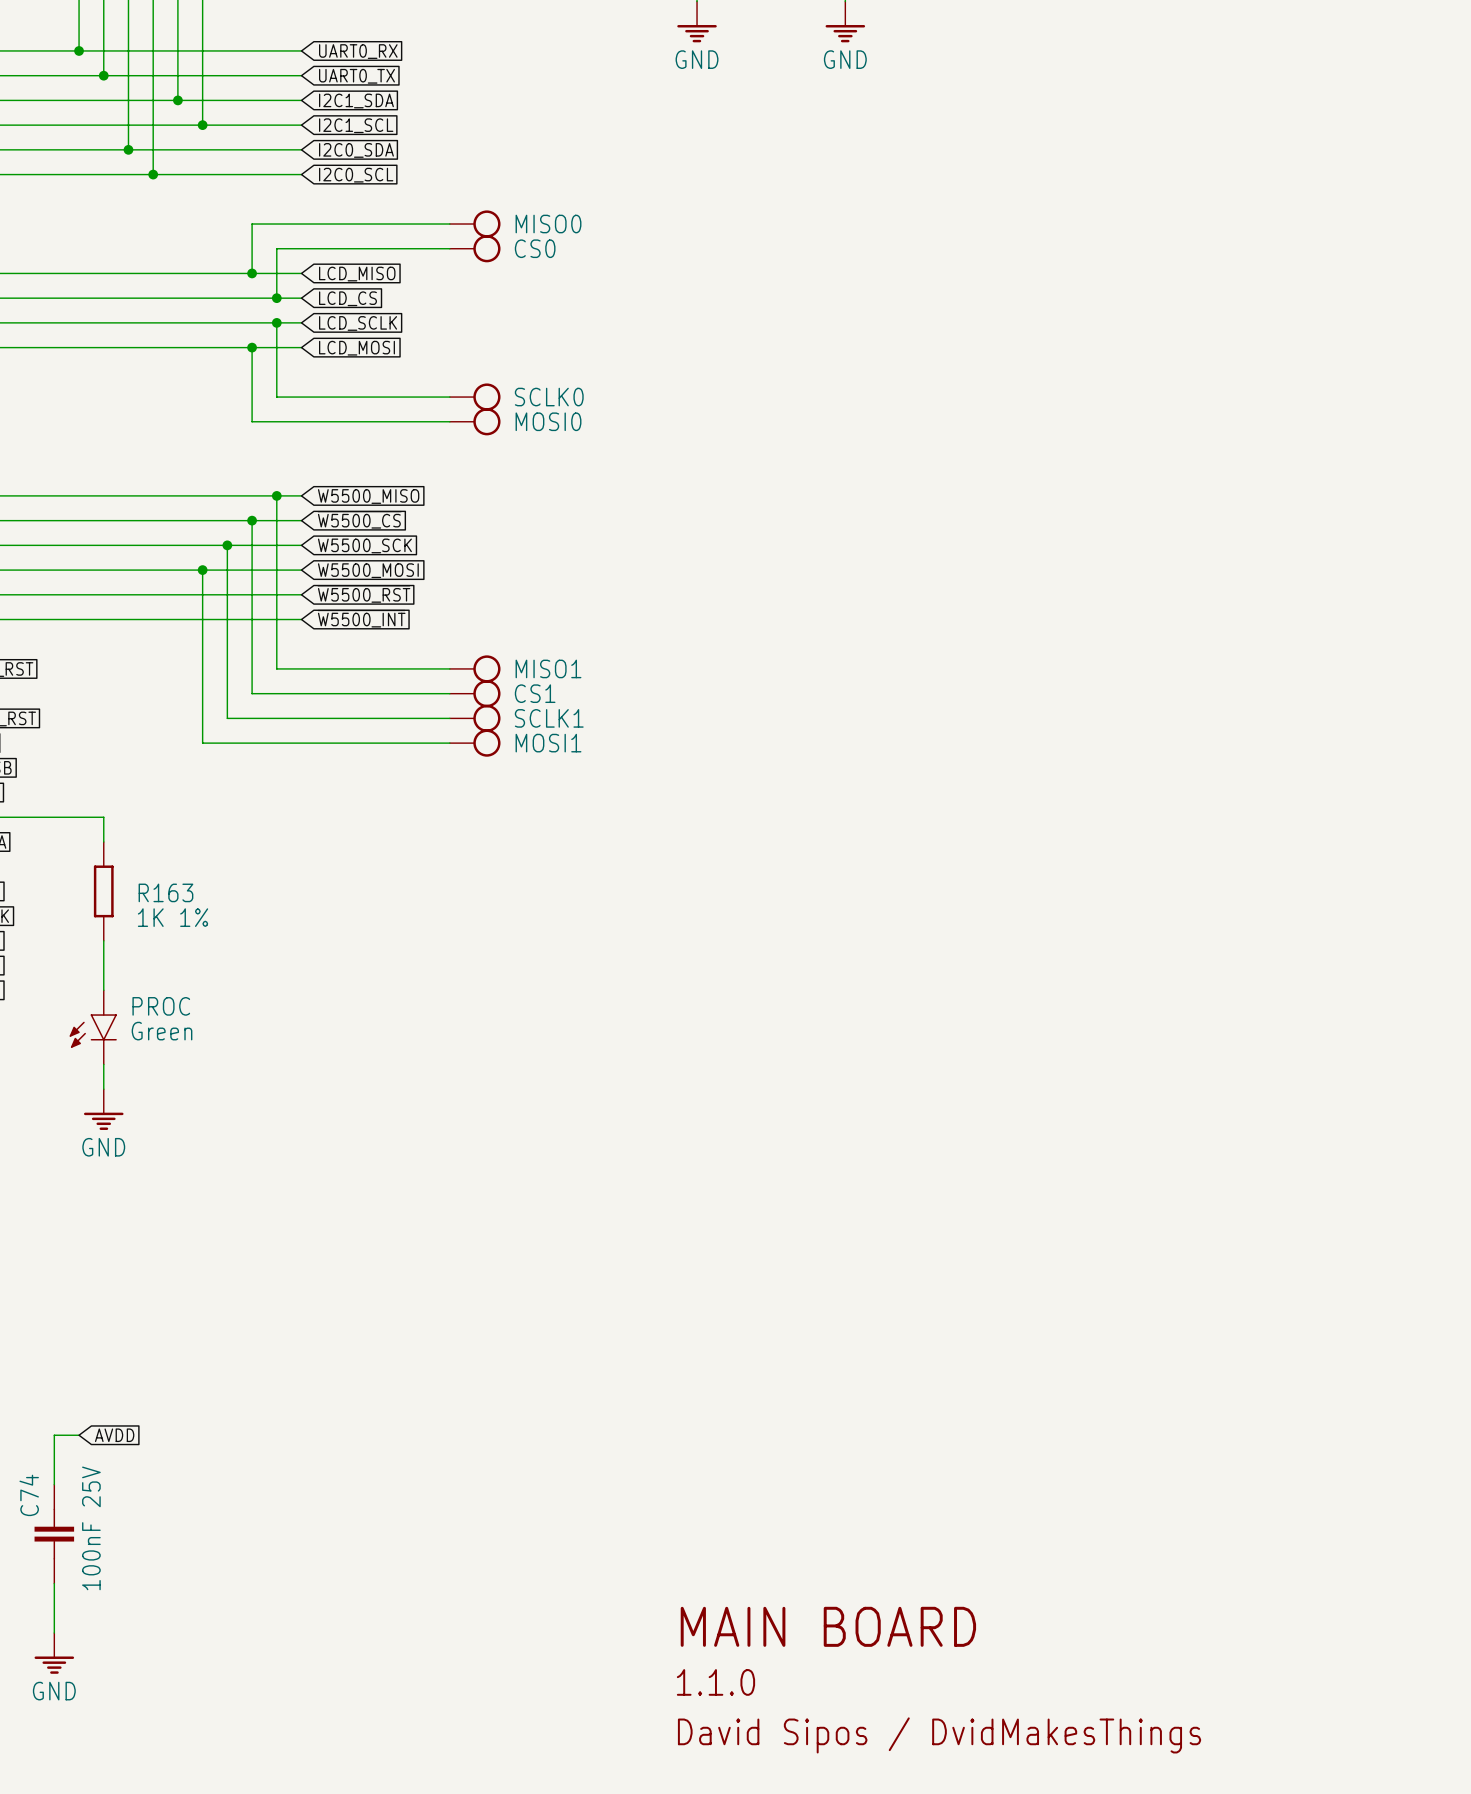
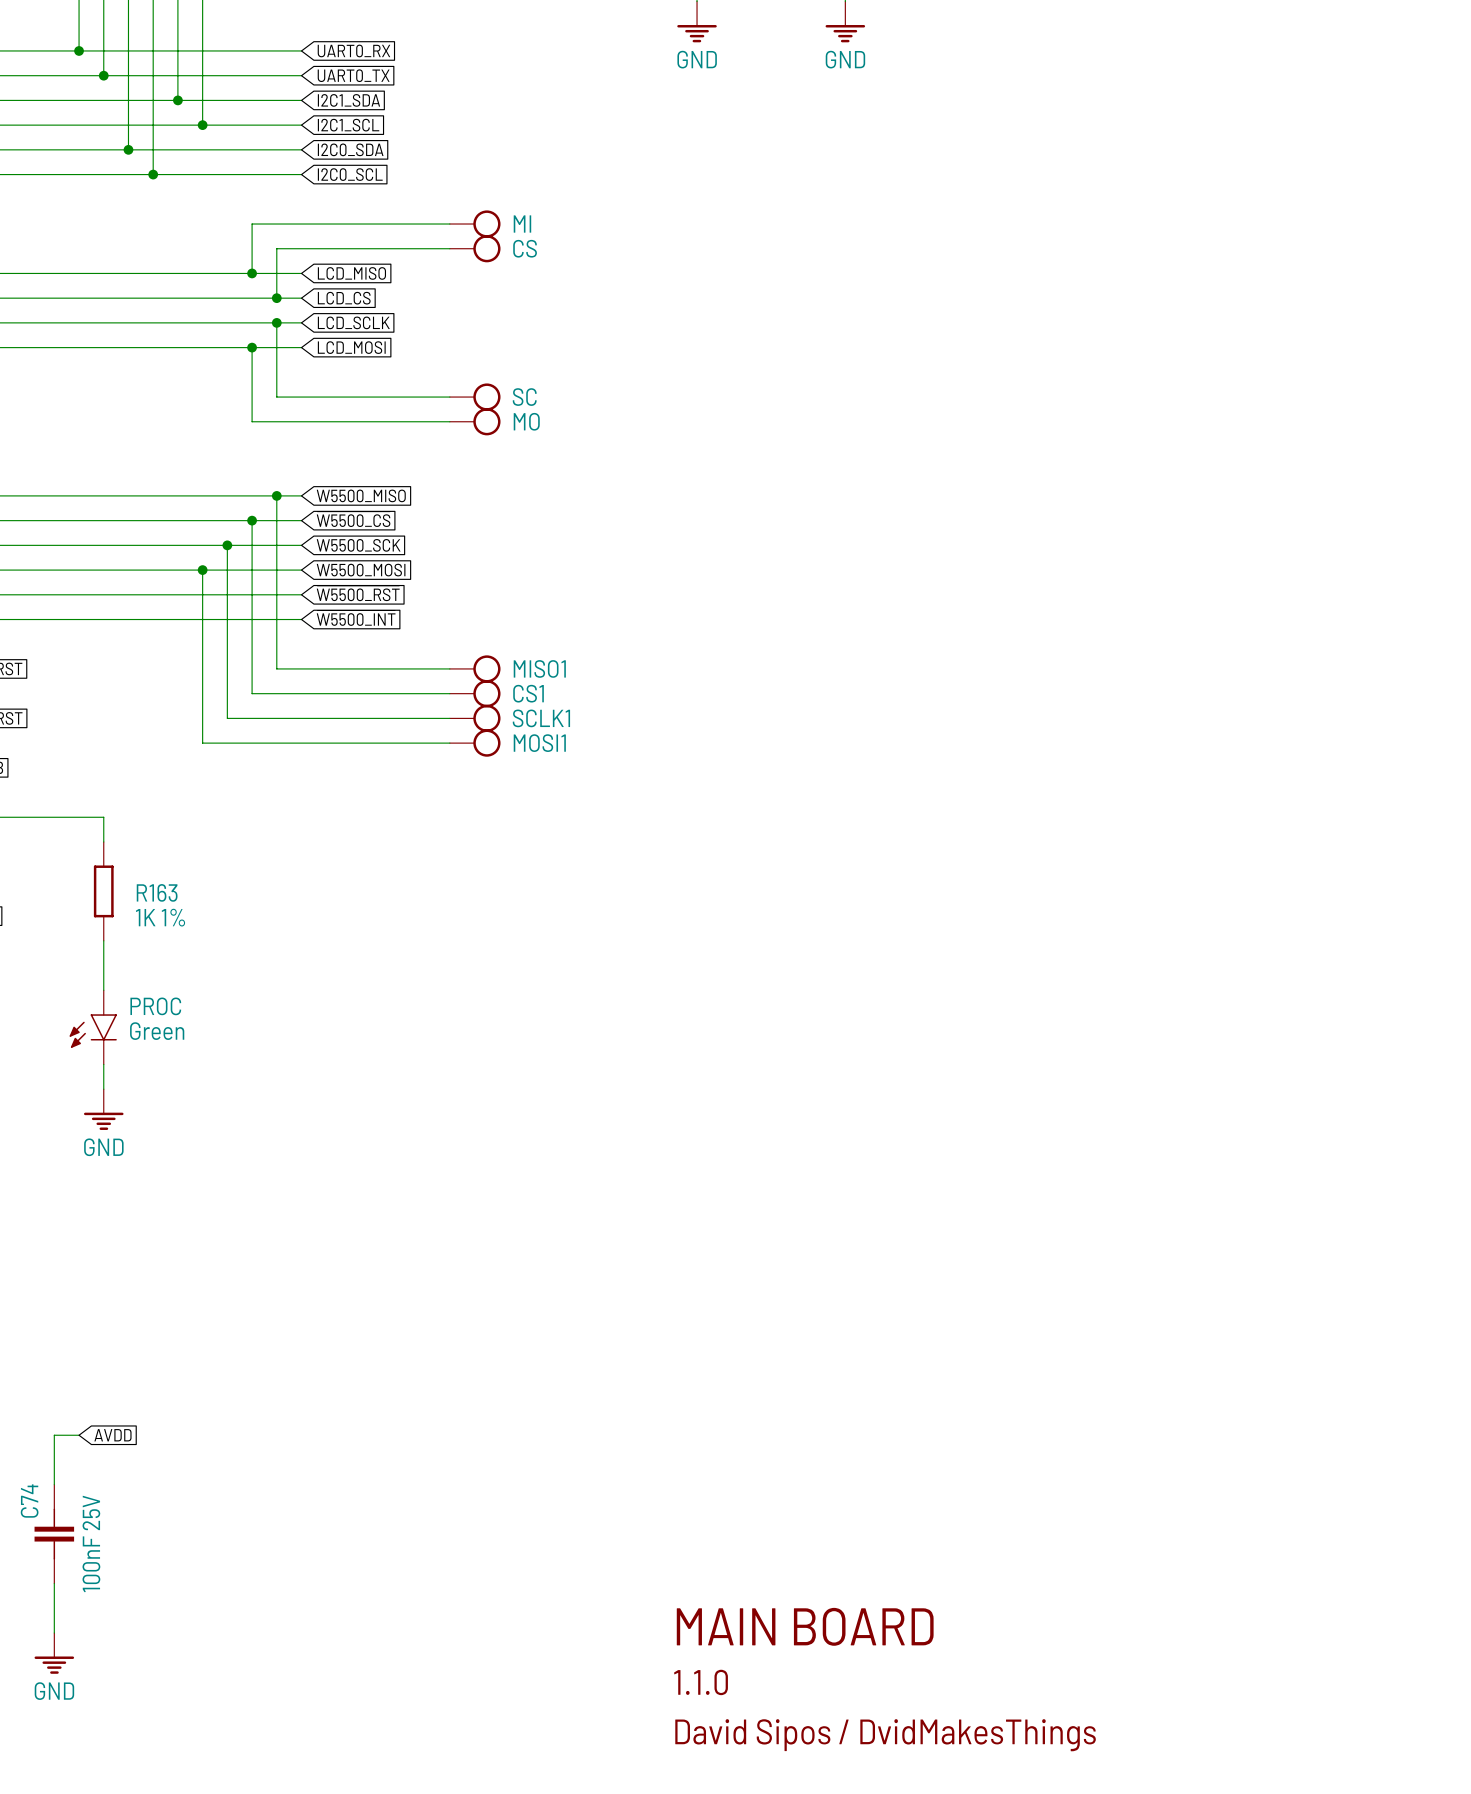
MISO0 name: MISO0 (548, 224) -> MI (522, 224)
CS0 name: CS0 (535, 248) -> CS (525, 248)
SCLK0 name: SCLK0 (549, 397) -> SC (524, 397)
MOSI0 name: MOSI0 (548, 421) -> MO (526, 421)

